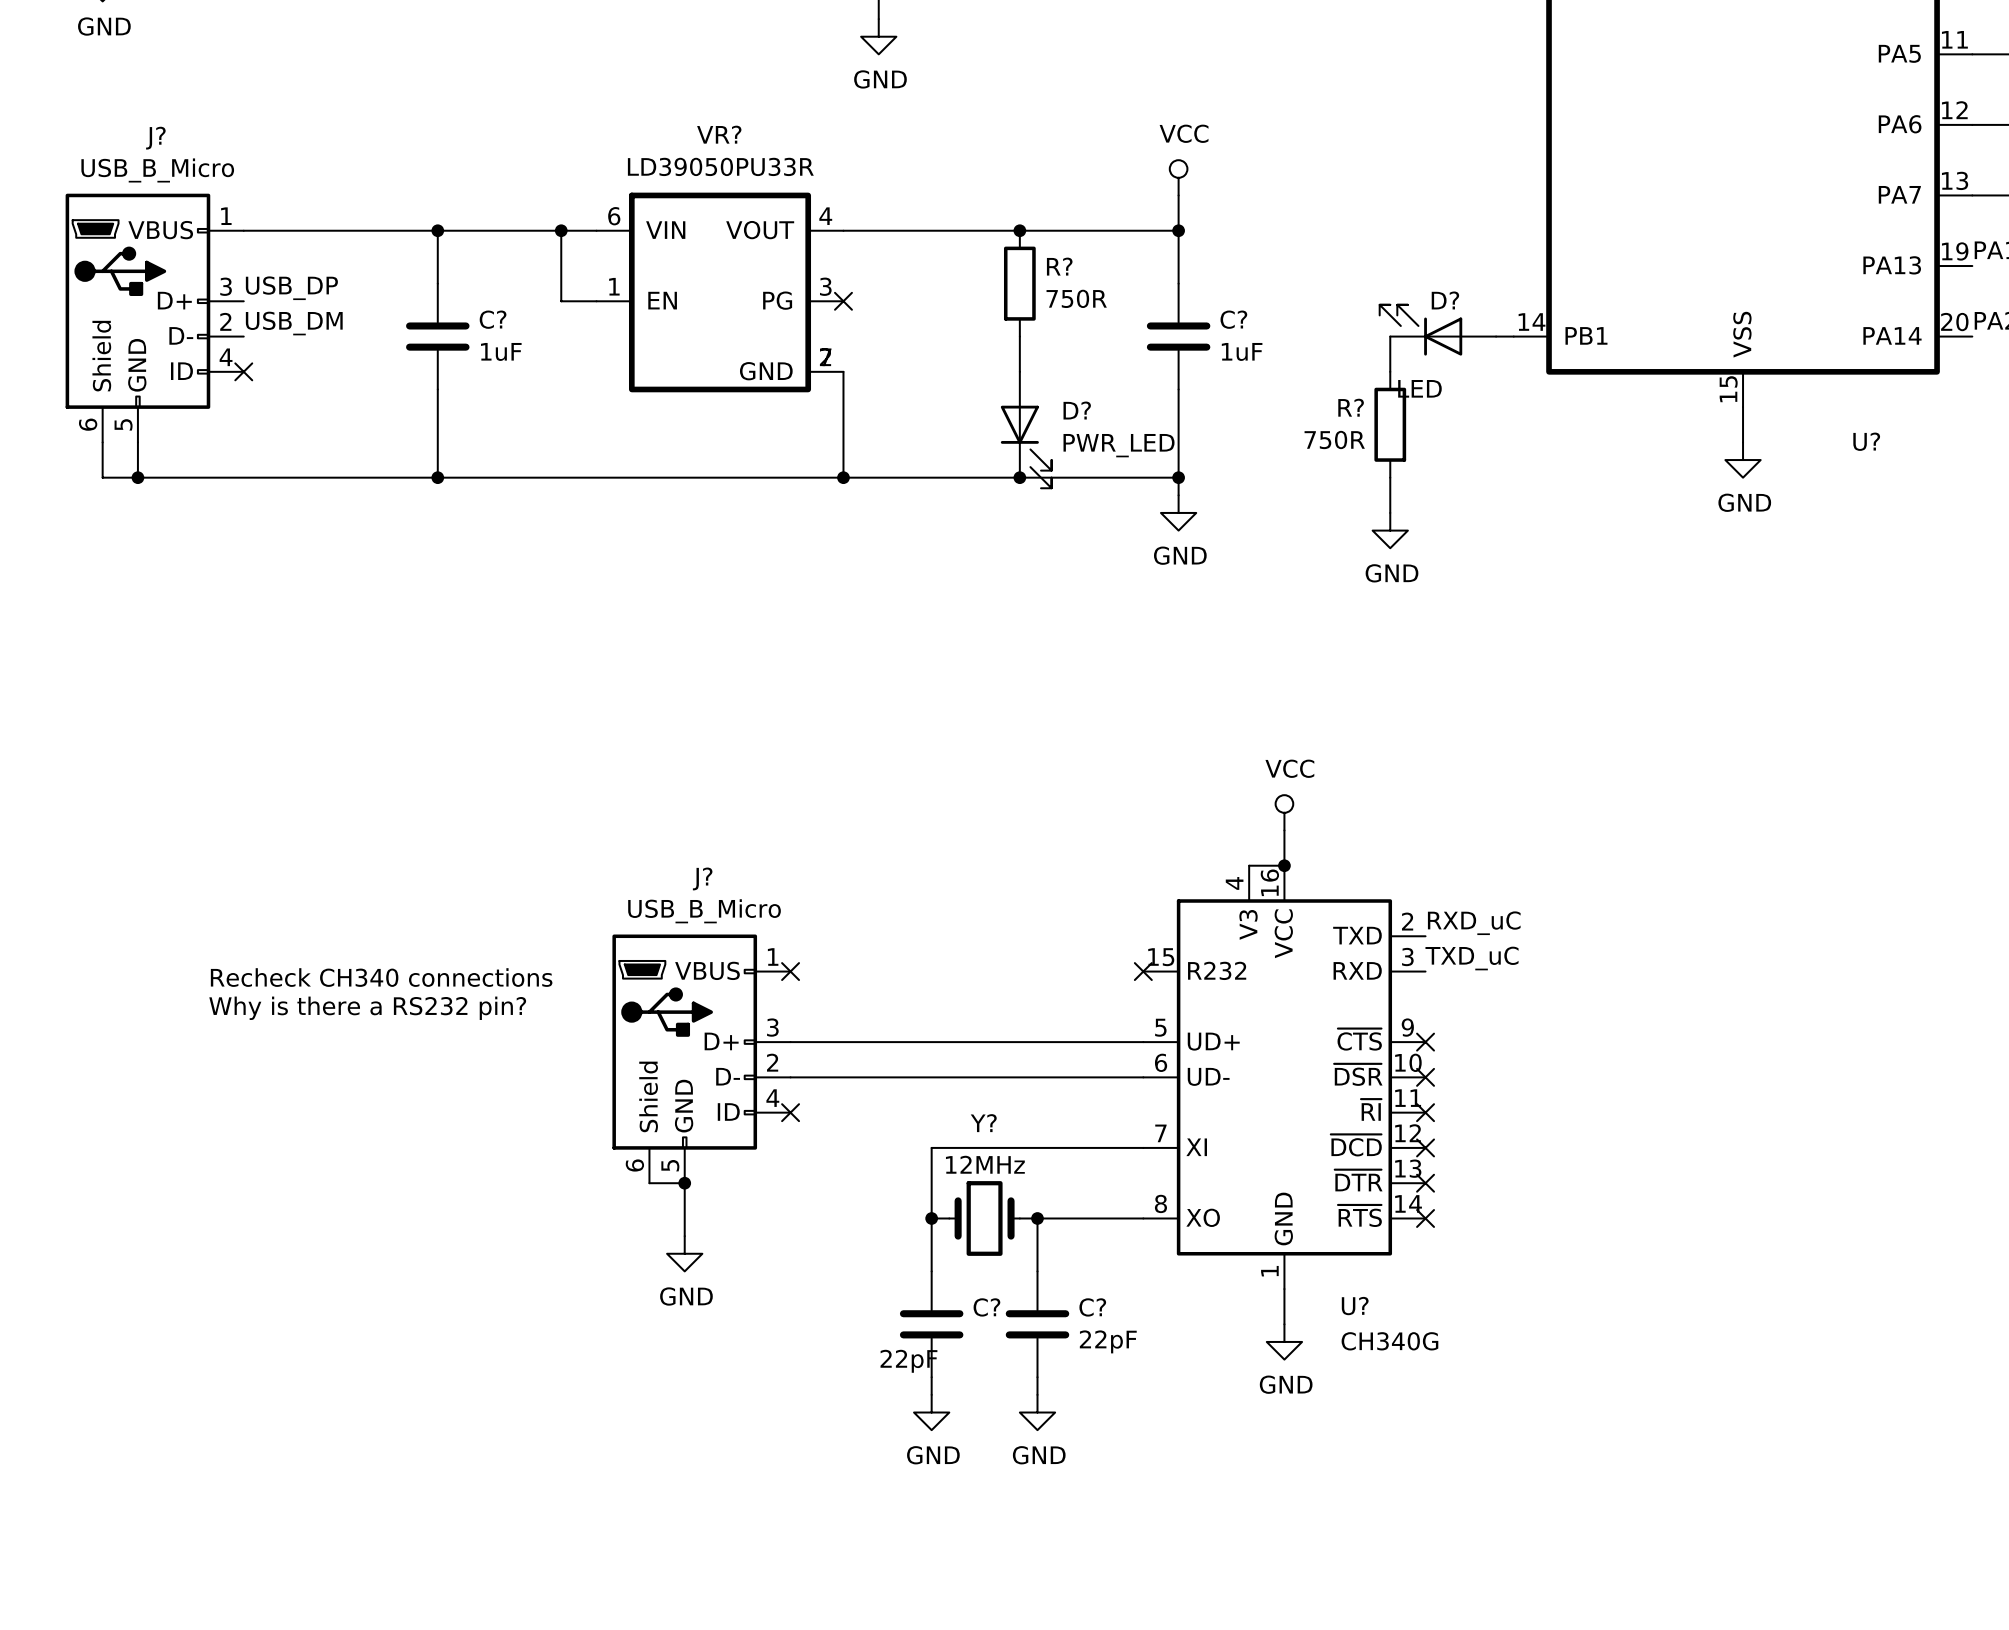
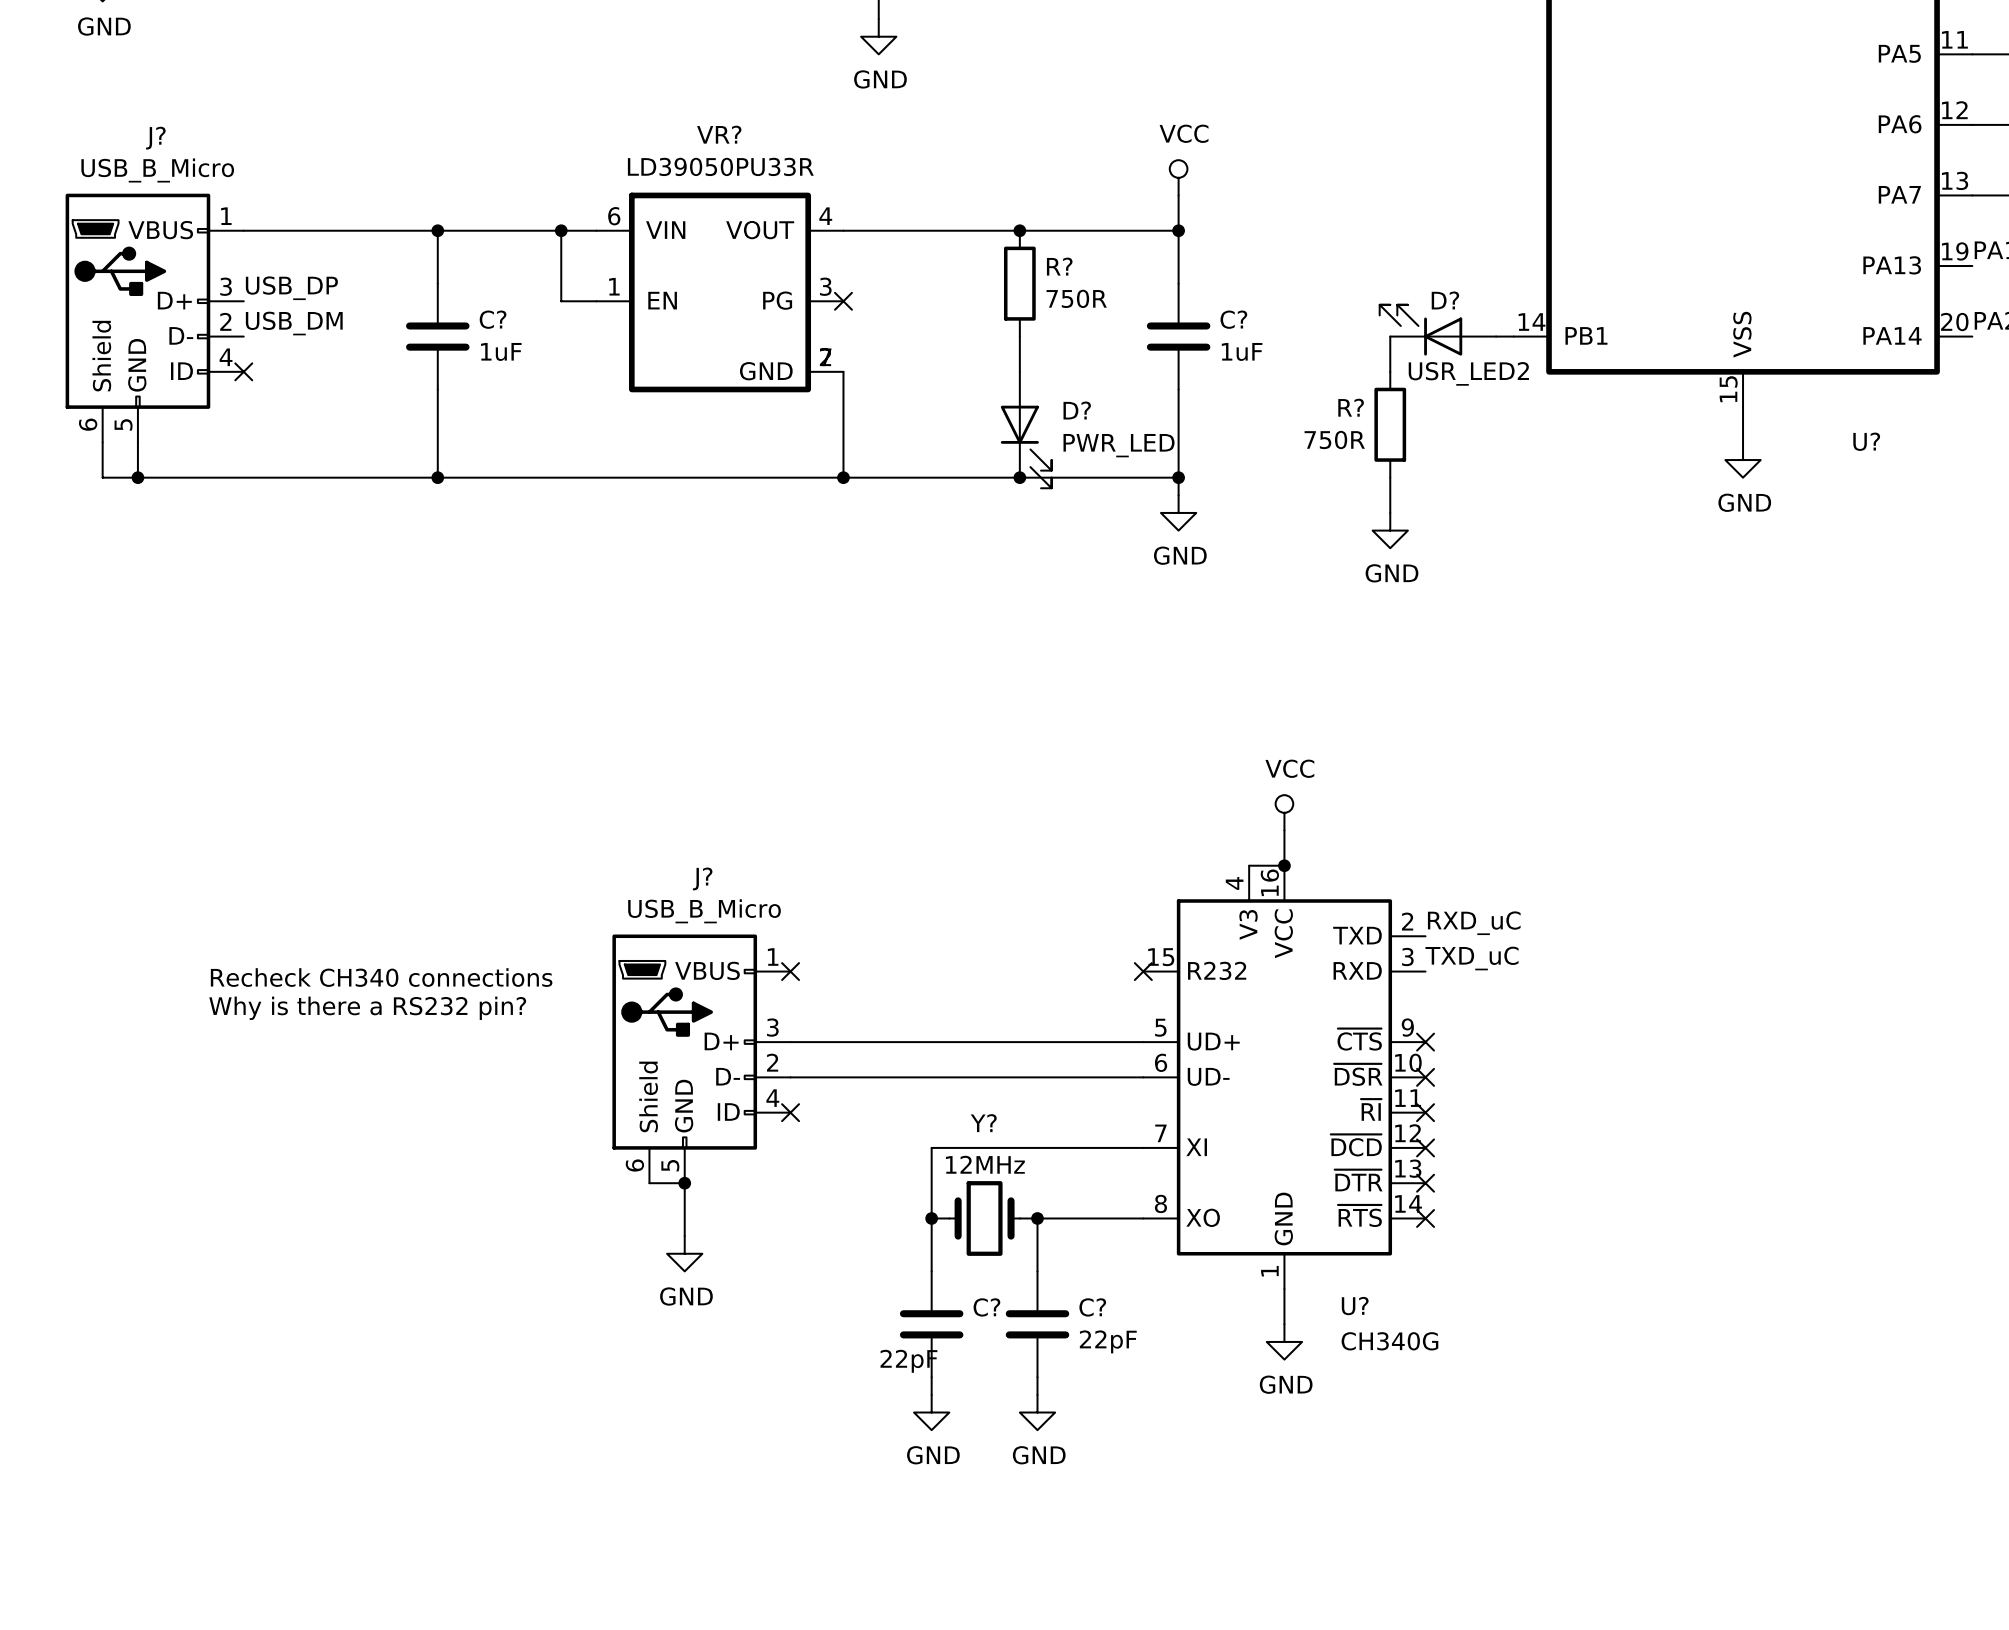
D? value: LED (1419, 388) -> USR_LED2 (1468, 373)

